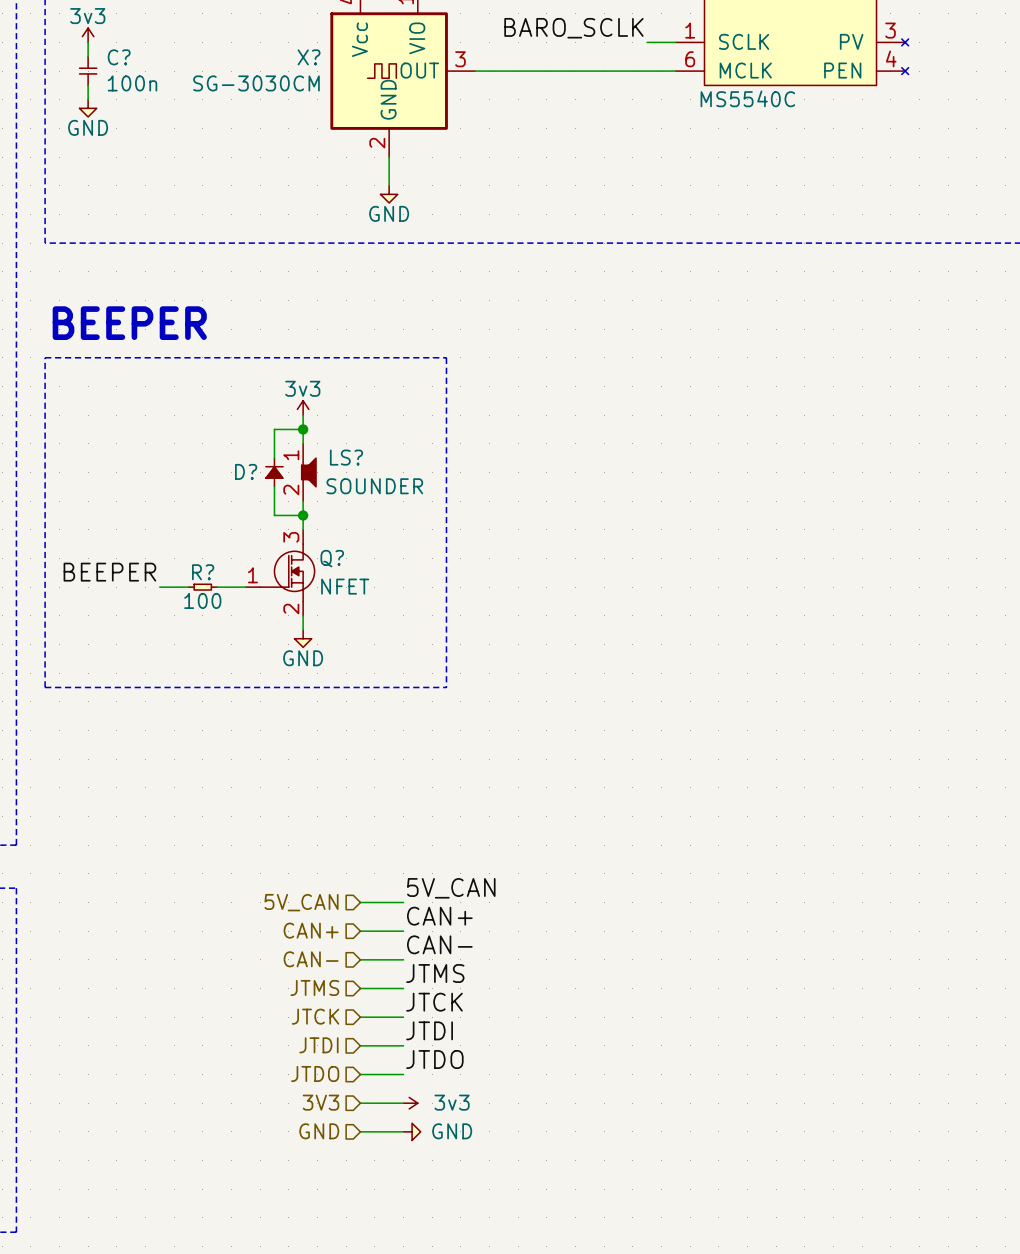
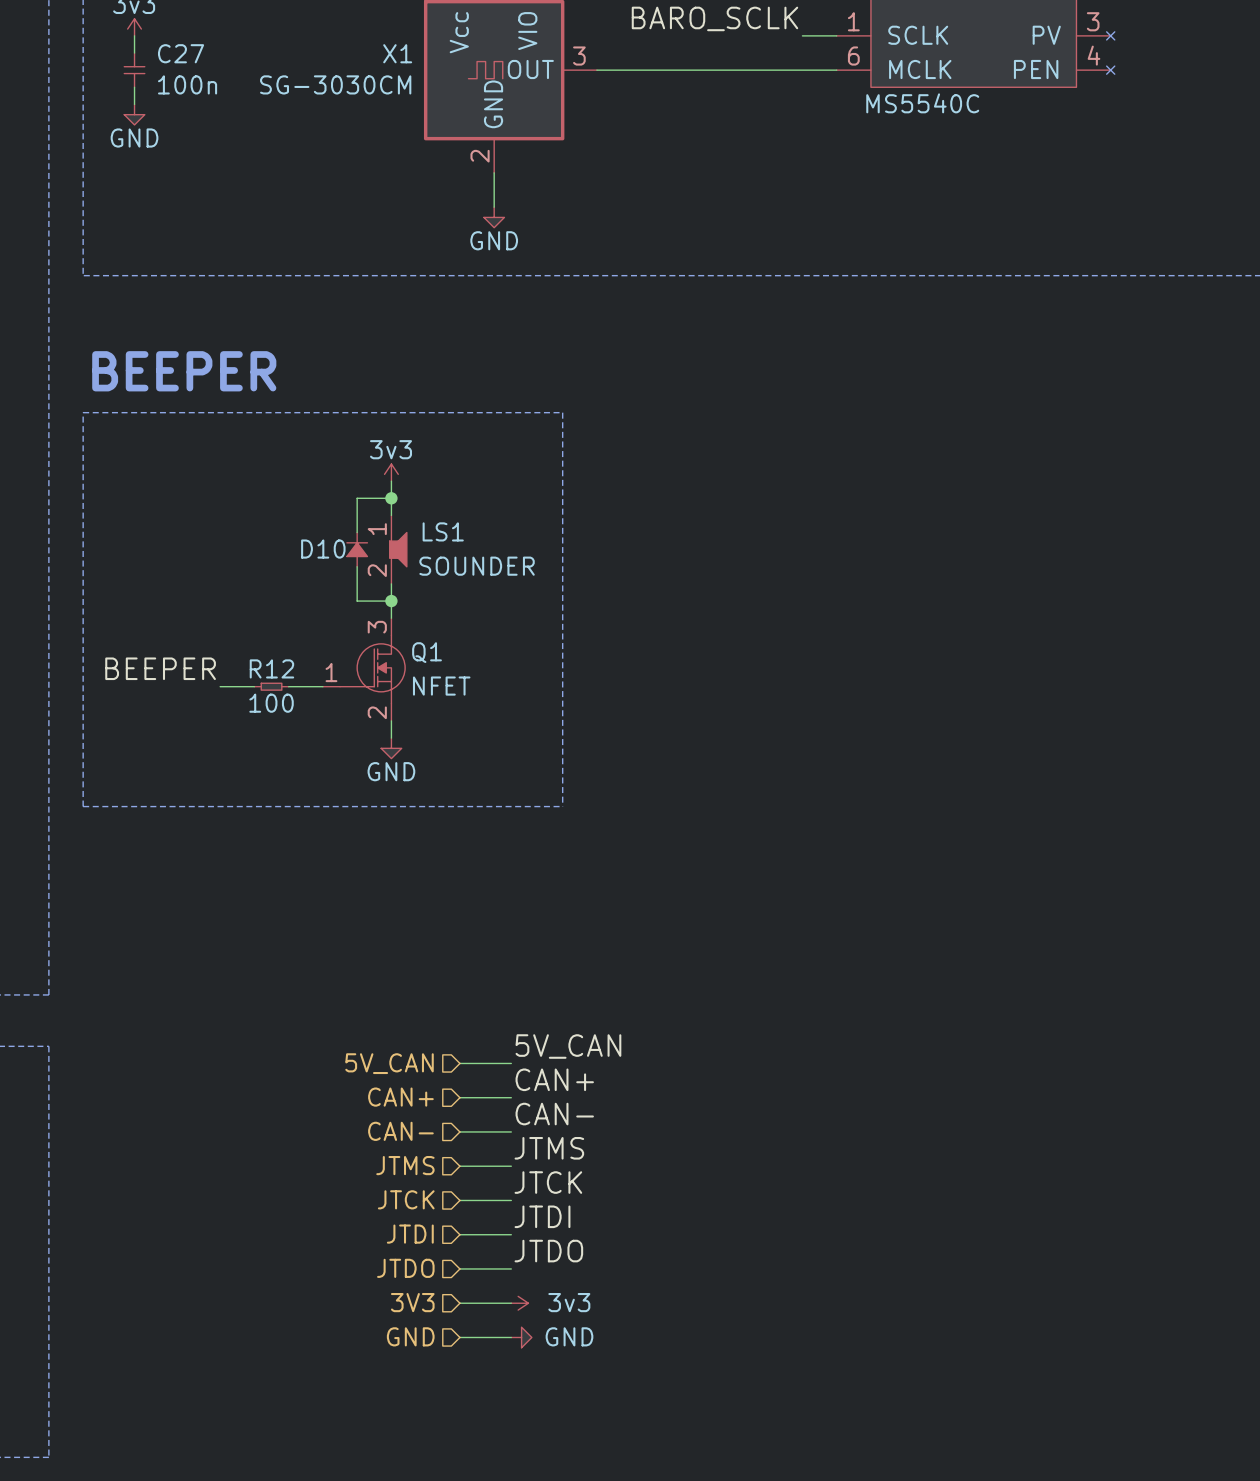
C? name: C? (119, 57) -> C27 (181, 53)
X? name: X? (309, 57) -> X1 (397, 53)
LS? name: LS? (346, 457) -> LS1 (443, 531)
D? name: D? (246, 471) -> D10 (323, 549)
Q? name: Q? (332, 558) -> Q1 (427, 652)
R? name: R? (203, 572) -> R12 (271, 668)

